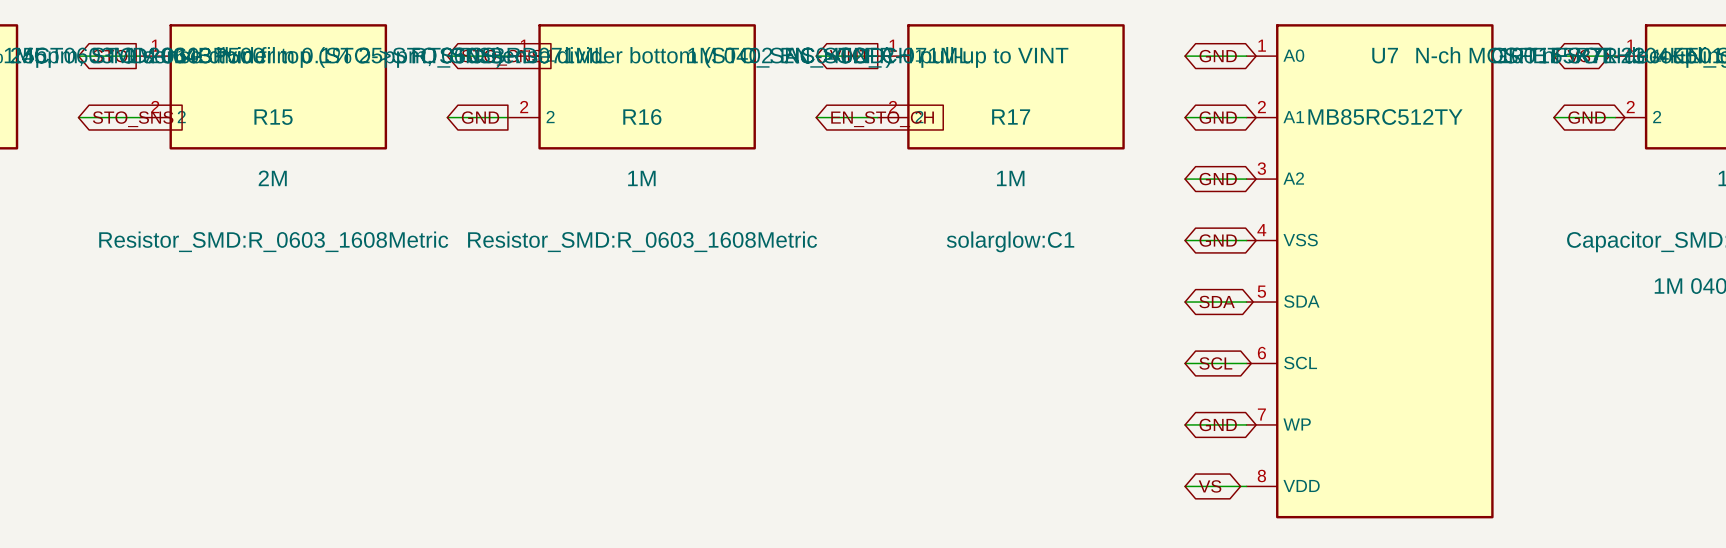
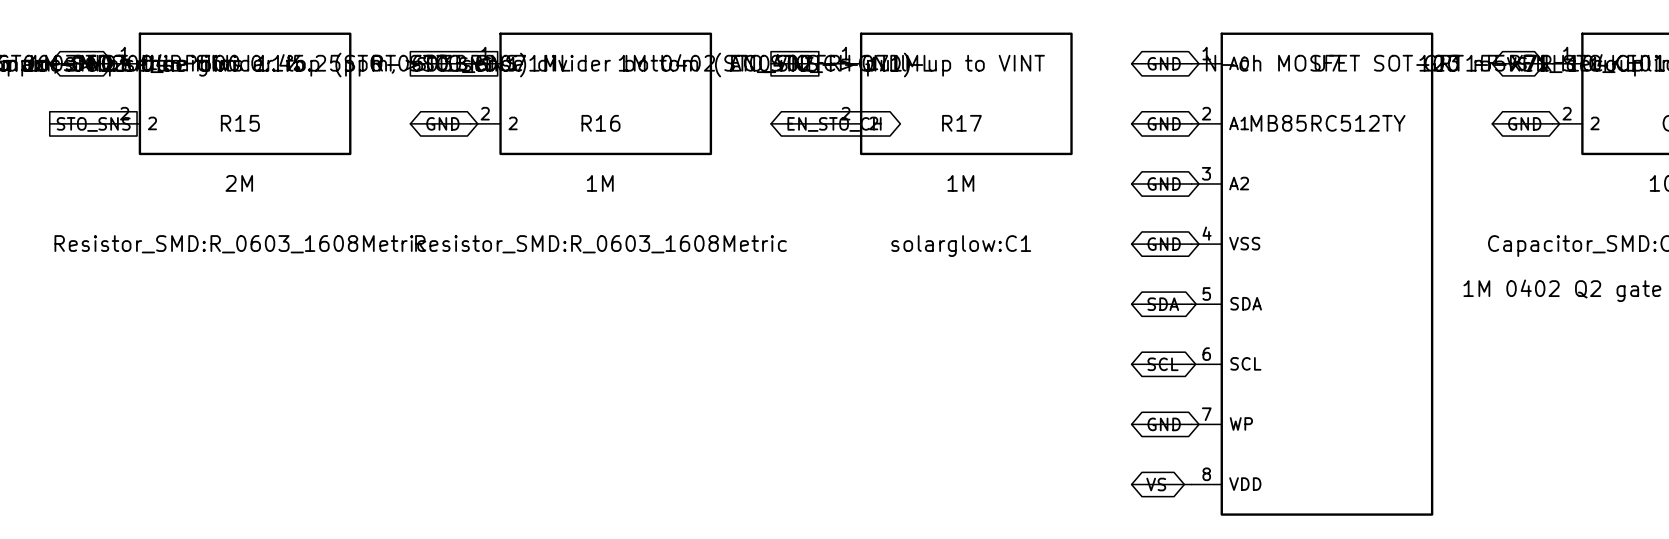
global label shape: input (110, 56) -> bidirectional (80, 63)
global label shape: input (849, 56) -> passive (795, 63)
global label shape: input (502, 57) -> passive (454, 64)
global label shape: input (480, 117) -> bidirectional (442, 123)
global label shape: input (133, 119) -> passive (93, 124)
global label shape: input (882, 119) -> bidirectional (834, 124)

